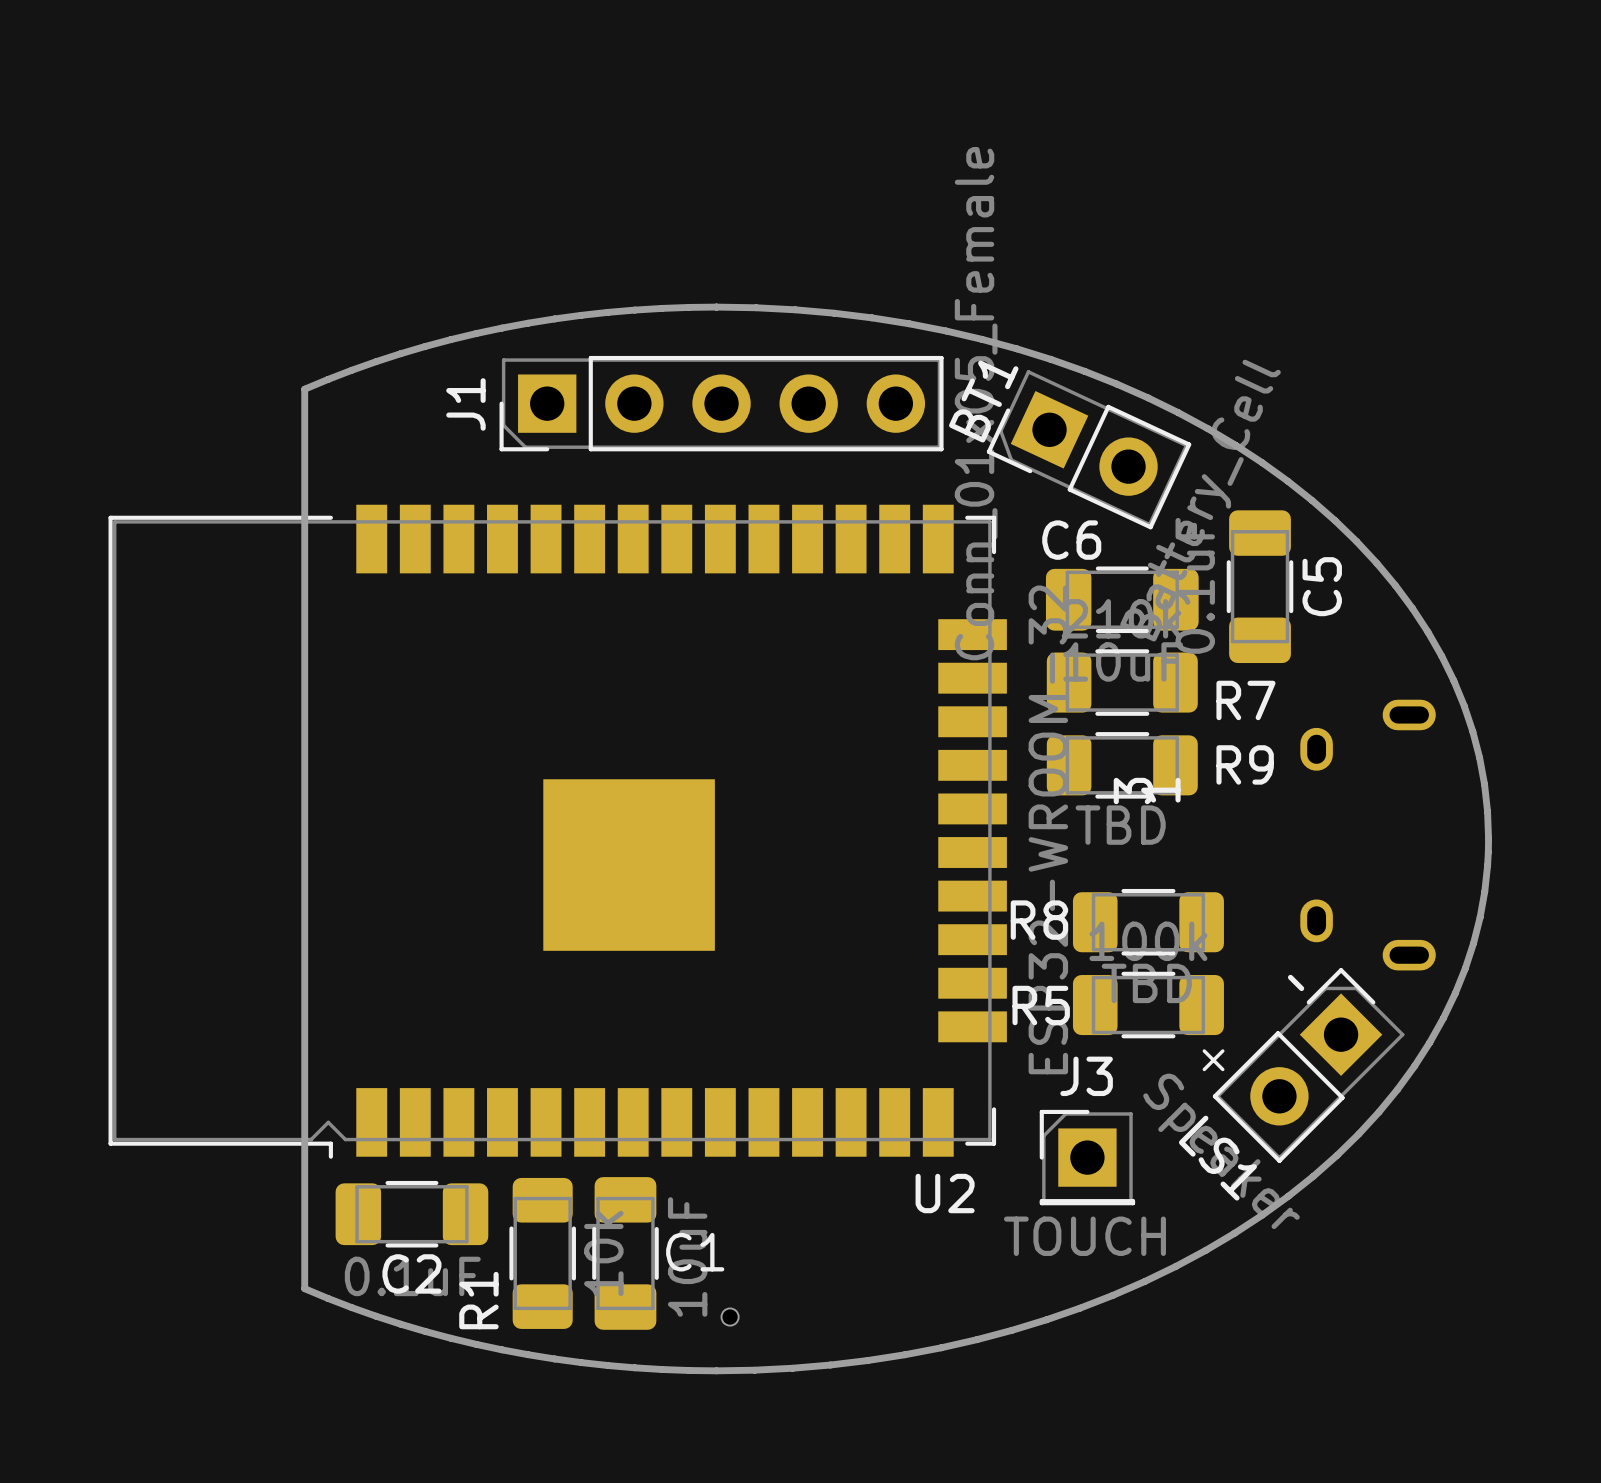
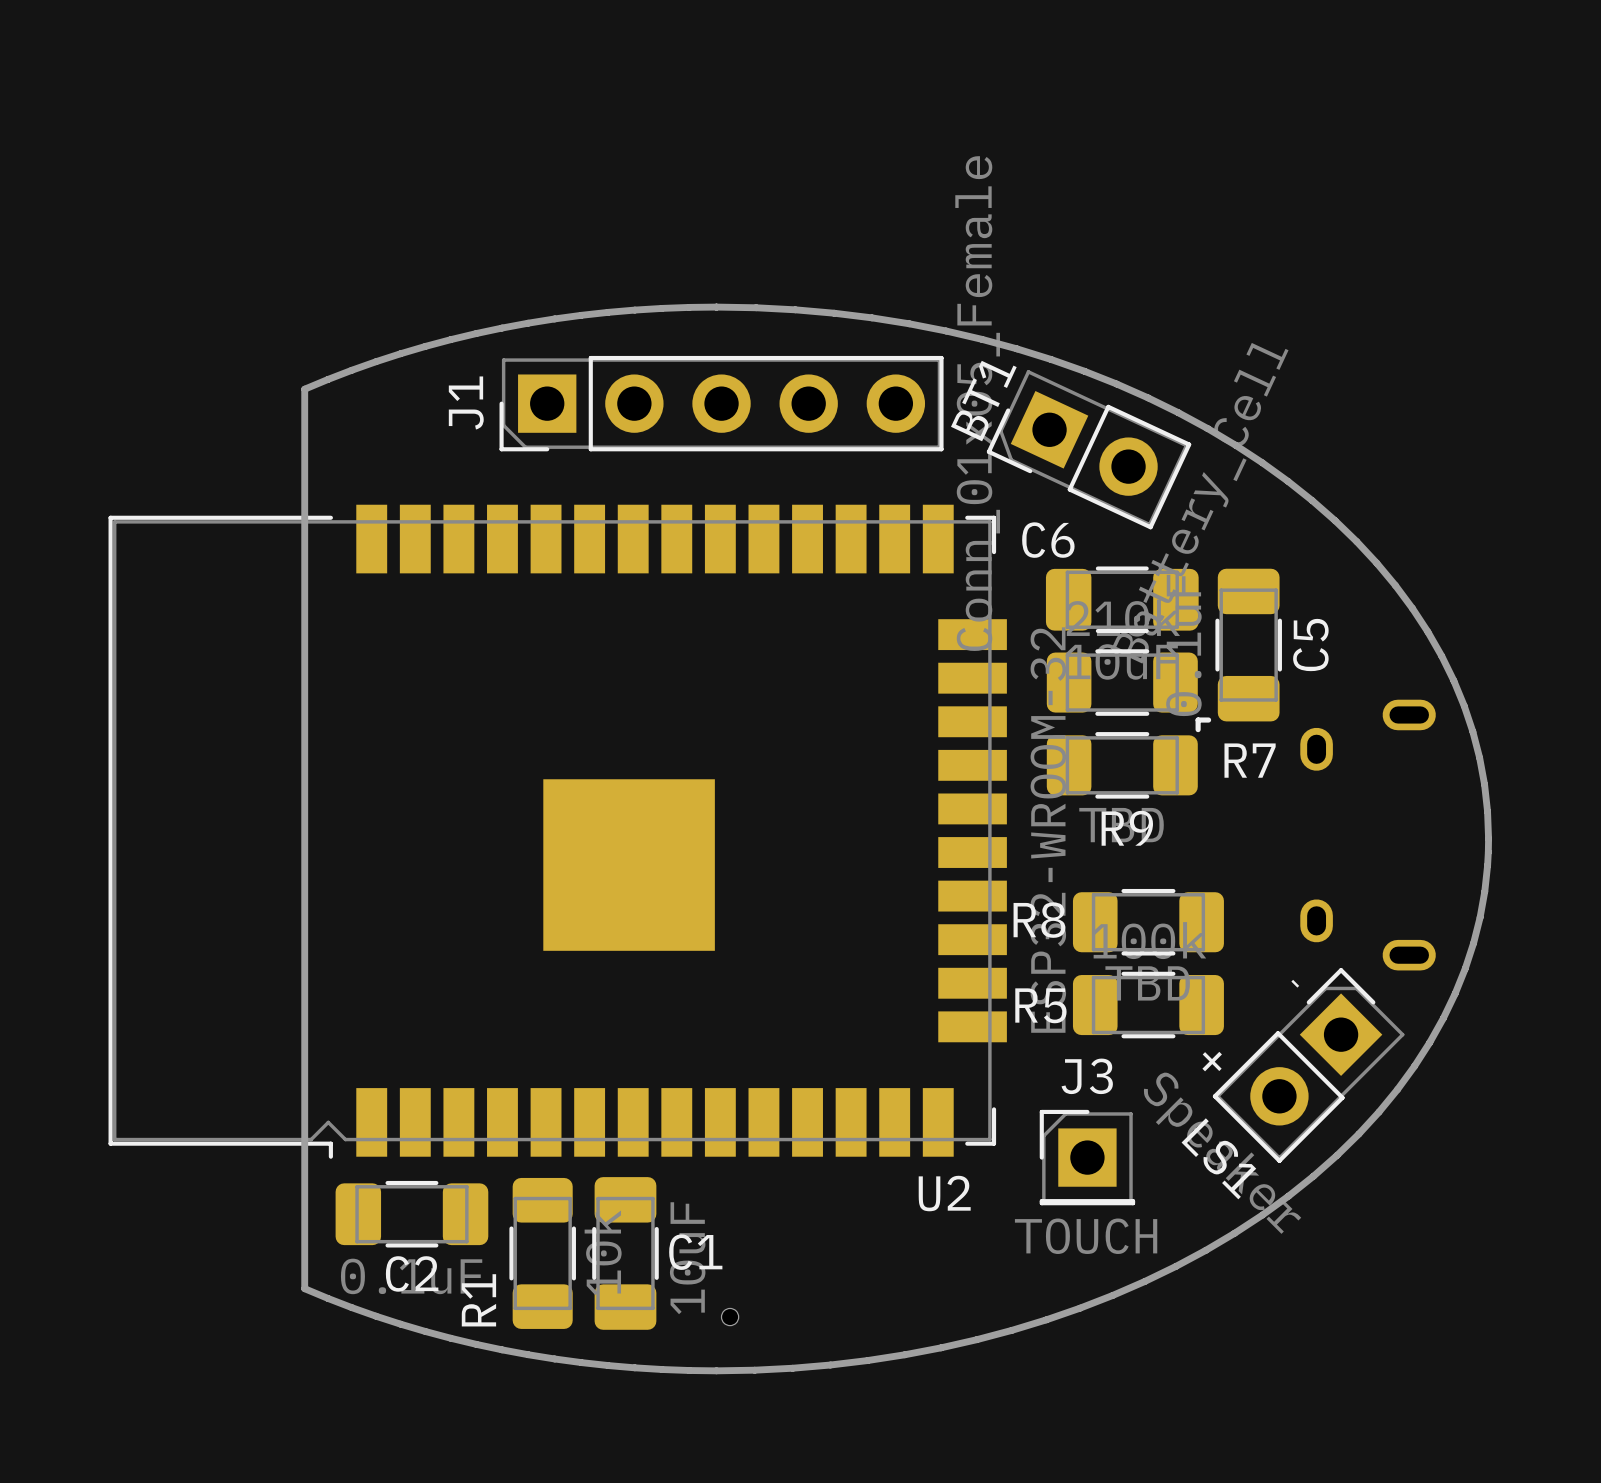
C6 name position: C6 (1071, 540) -> C6 (1048, 540)
C5 position: (1260, 586) -> (1248, 645)
R7 name position: R7 (1245, 700) -> R7 (1250, 760)
line: none -> (1208, 720) (1198, 720) (1198, 729)
R9 name position: R9 (1245, 764) -> R9 (1127, 828)
part: (1147, 791) -> none

